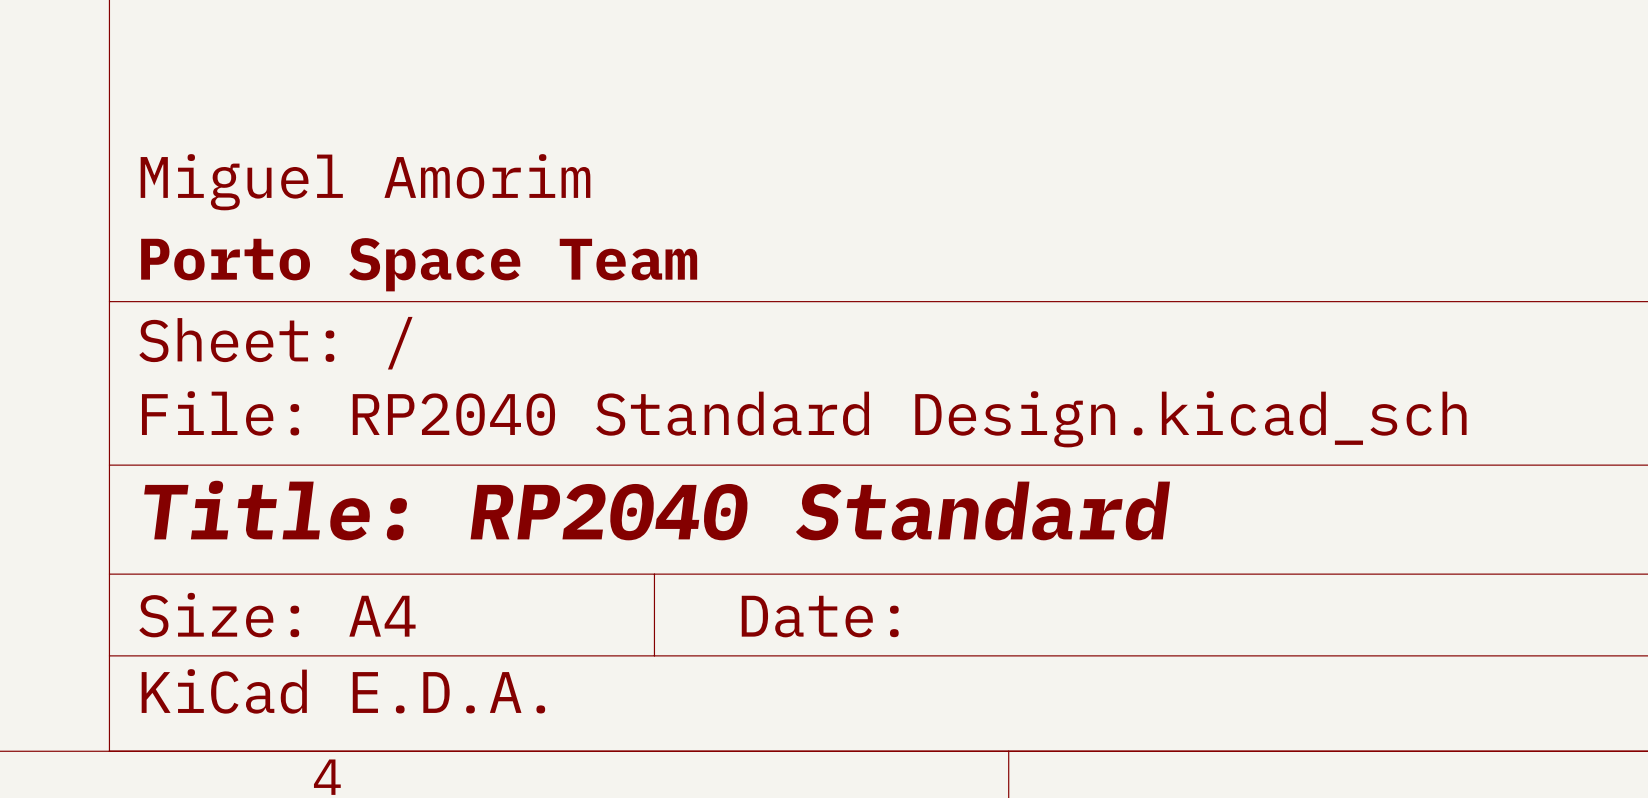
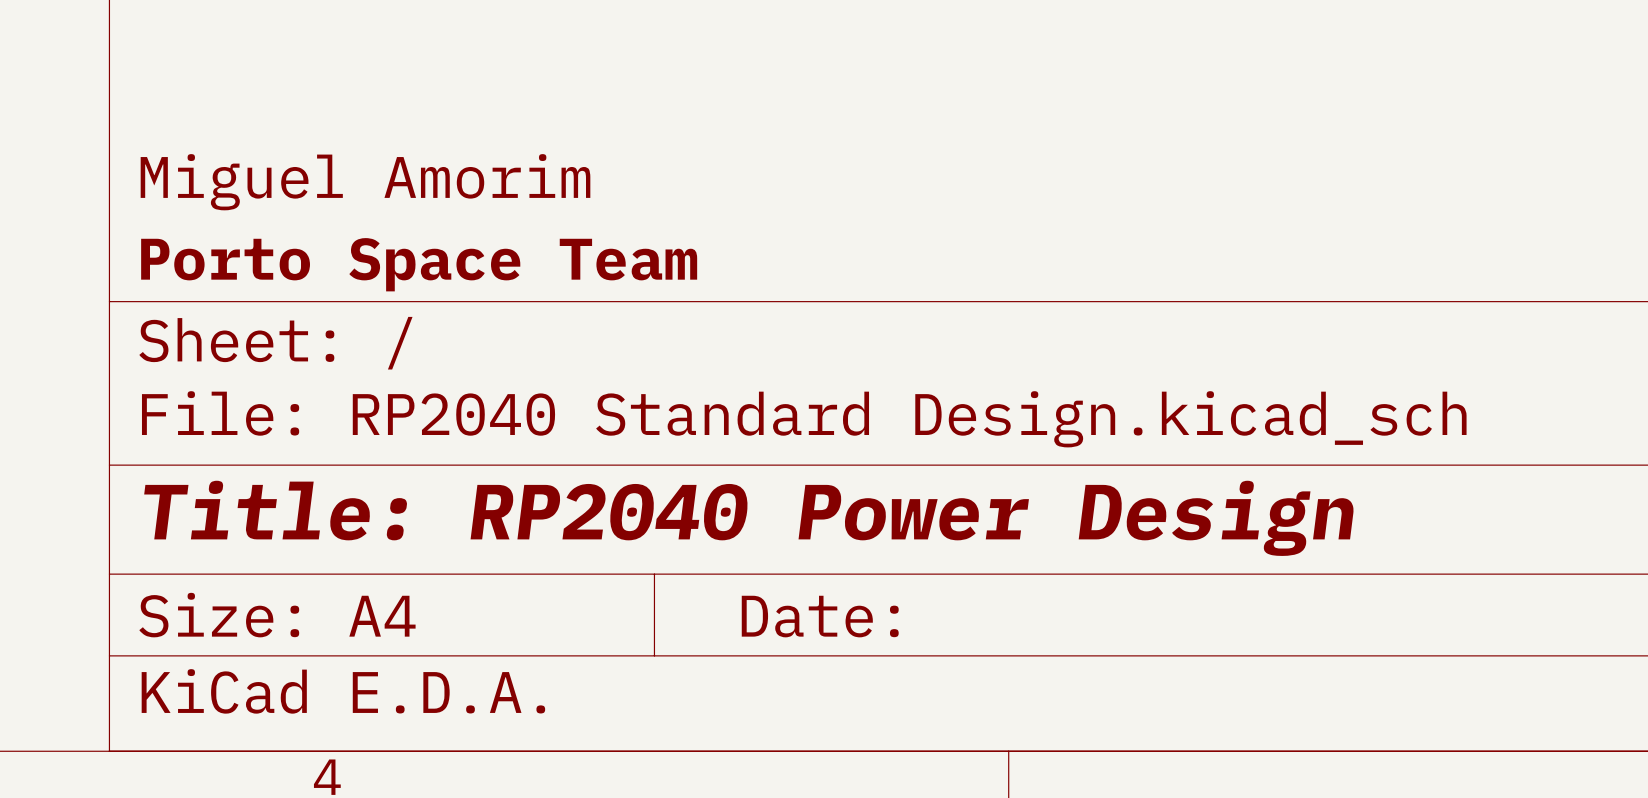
title block: Title: RP2040 Standard (657, 510) -> Title: RP2040 Power Design (748, 518)

